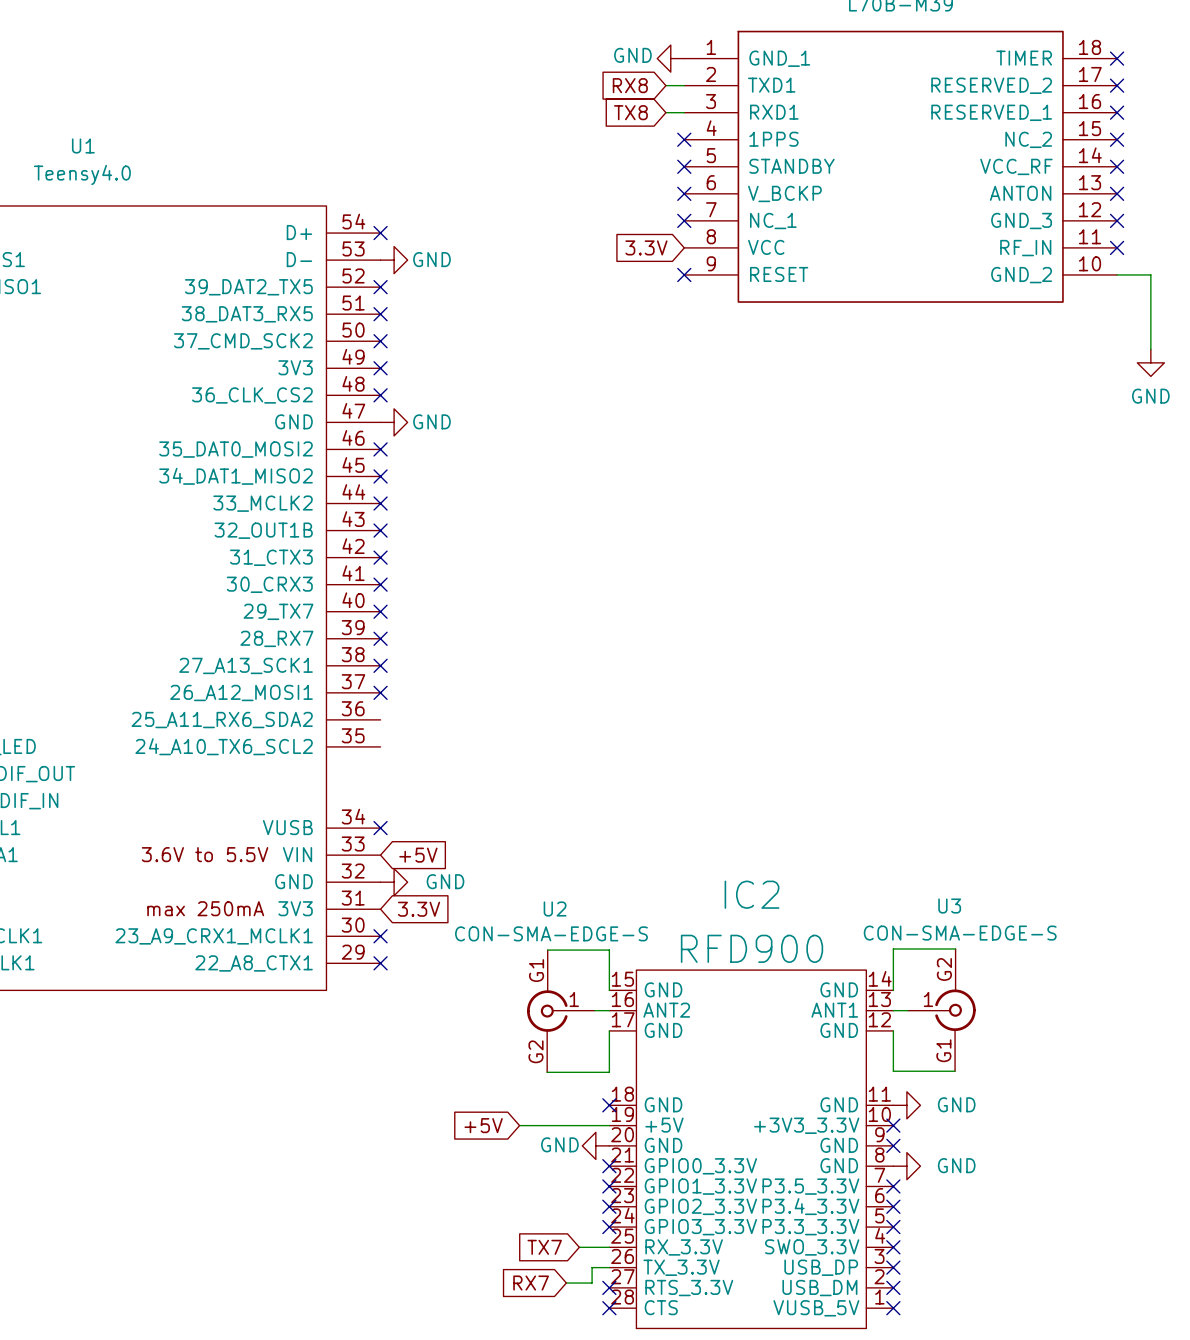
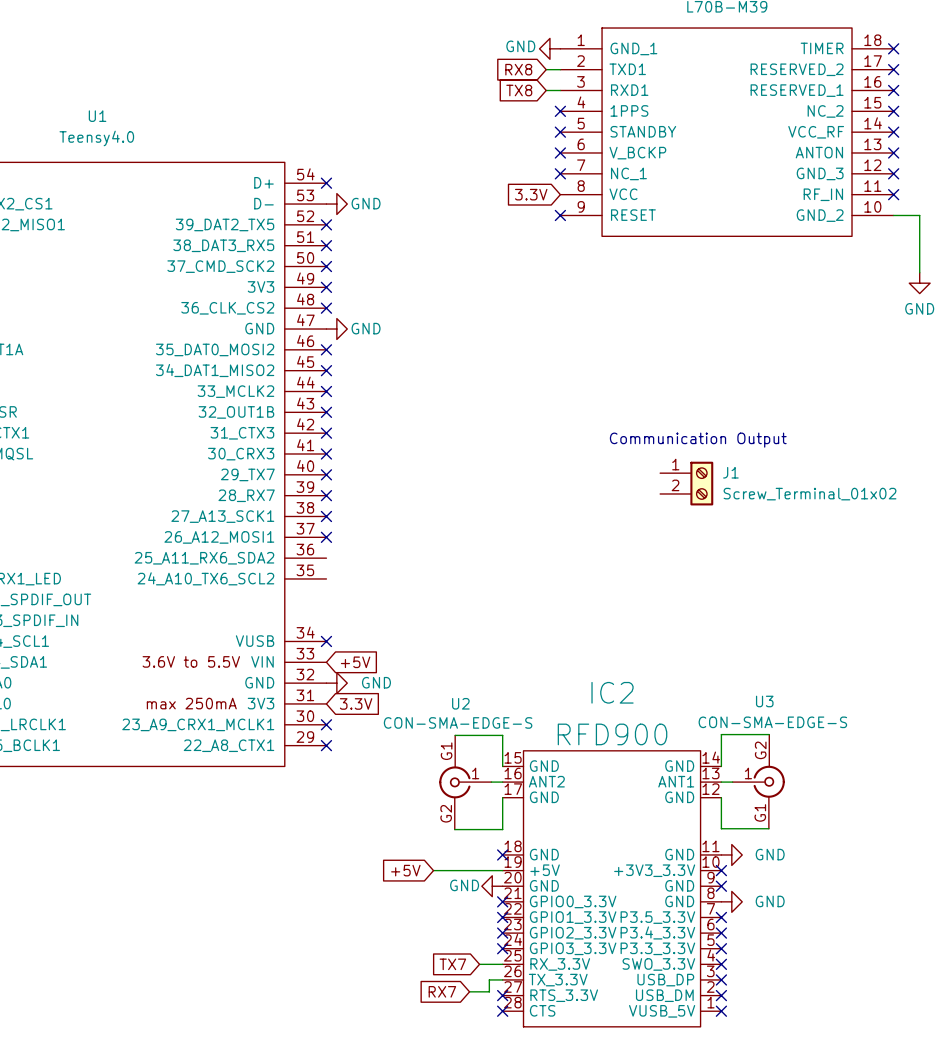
text: none -> Communication Output (698, 440)
J1: none -> Screw_Terminal_01x02 (686, 483)

